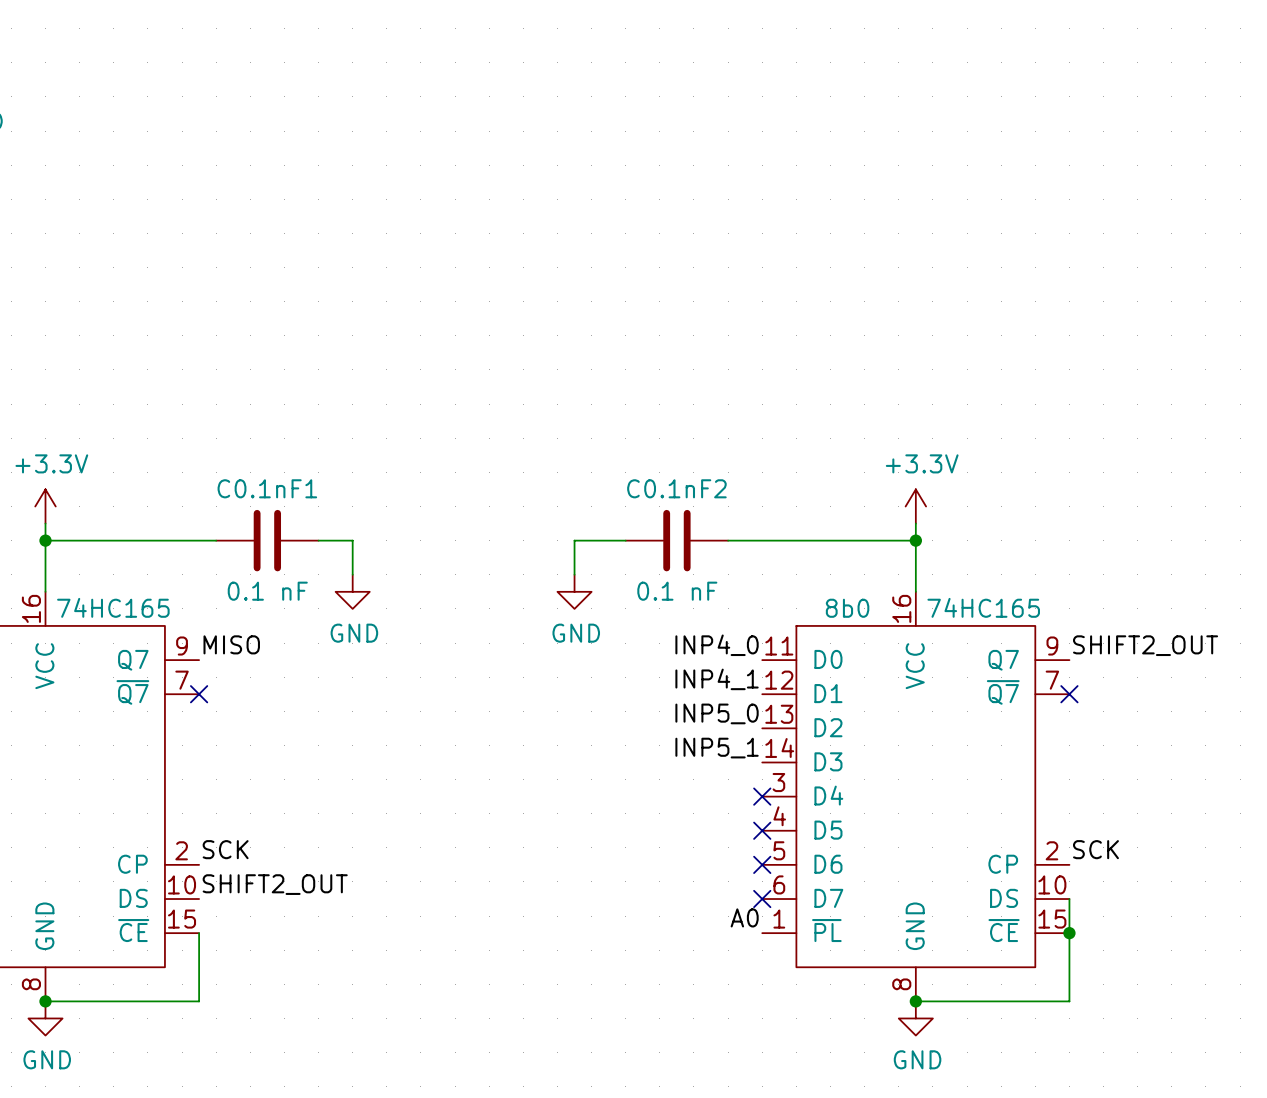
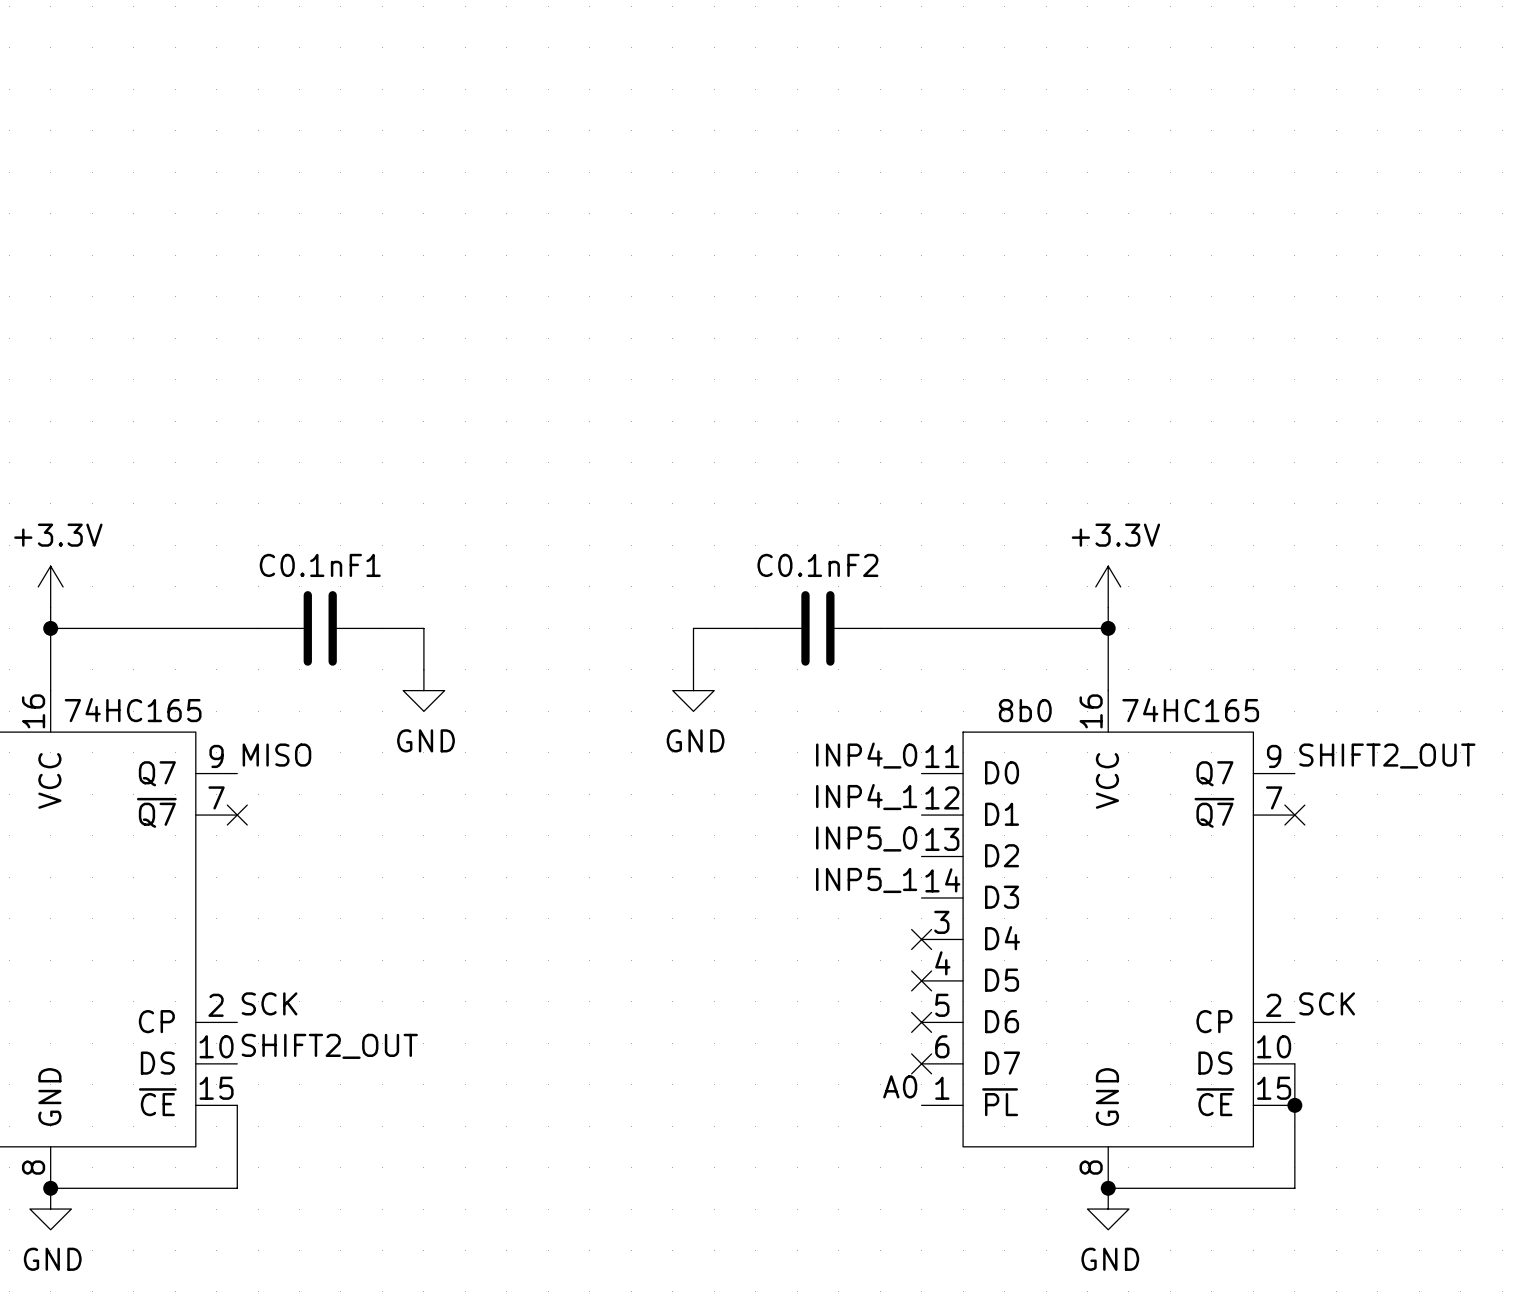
C0.1nF1 value: 0.1 nF (267, 591) -> none
C0.1nF2 value: 0.1 nF (677, 591) -> none

